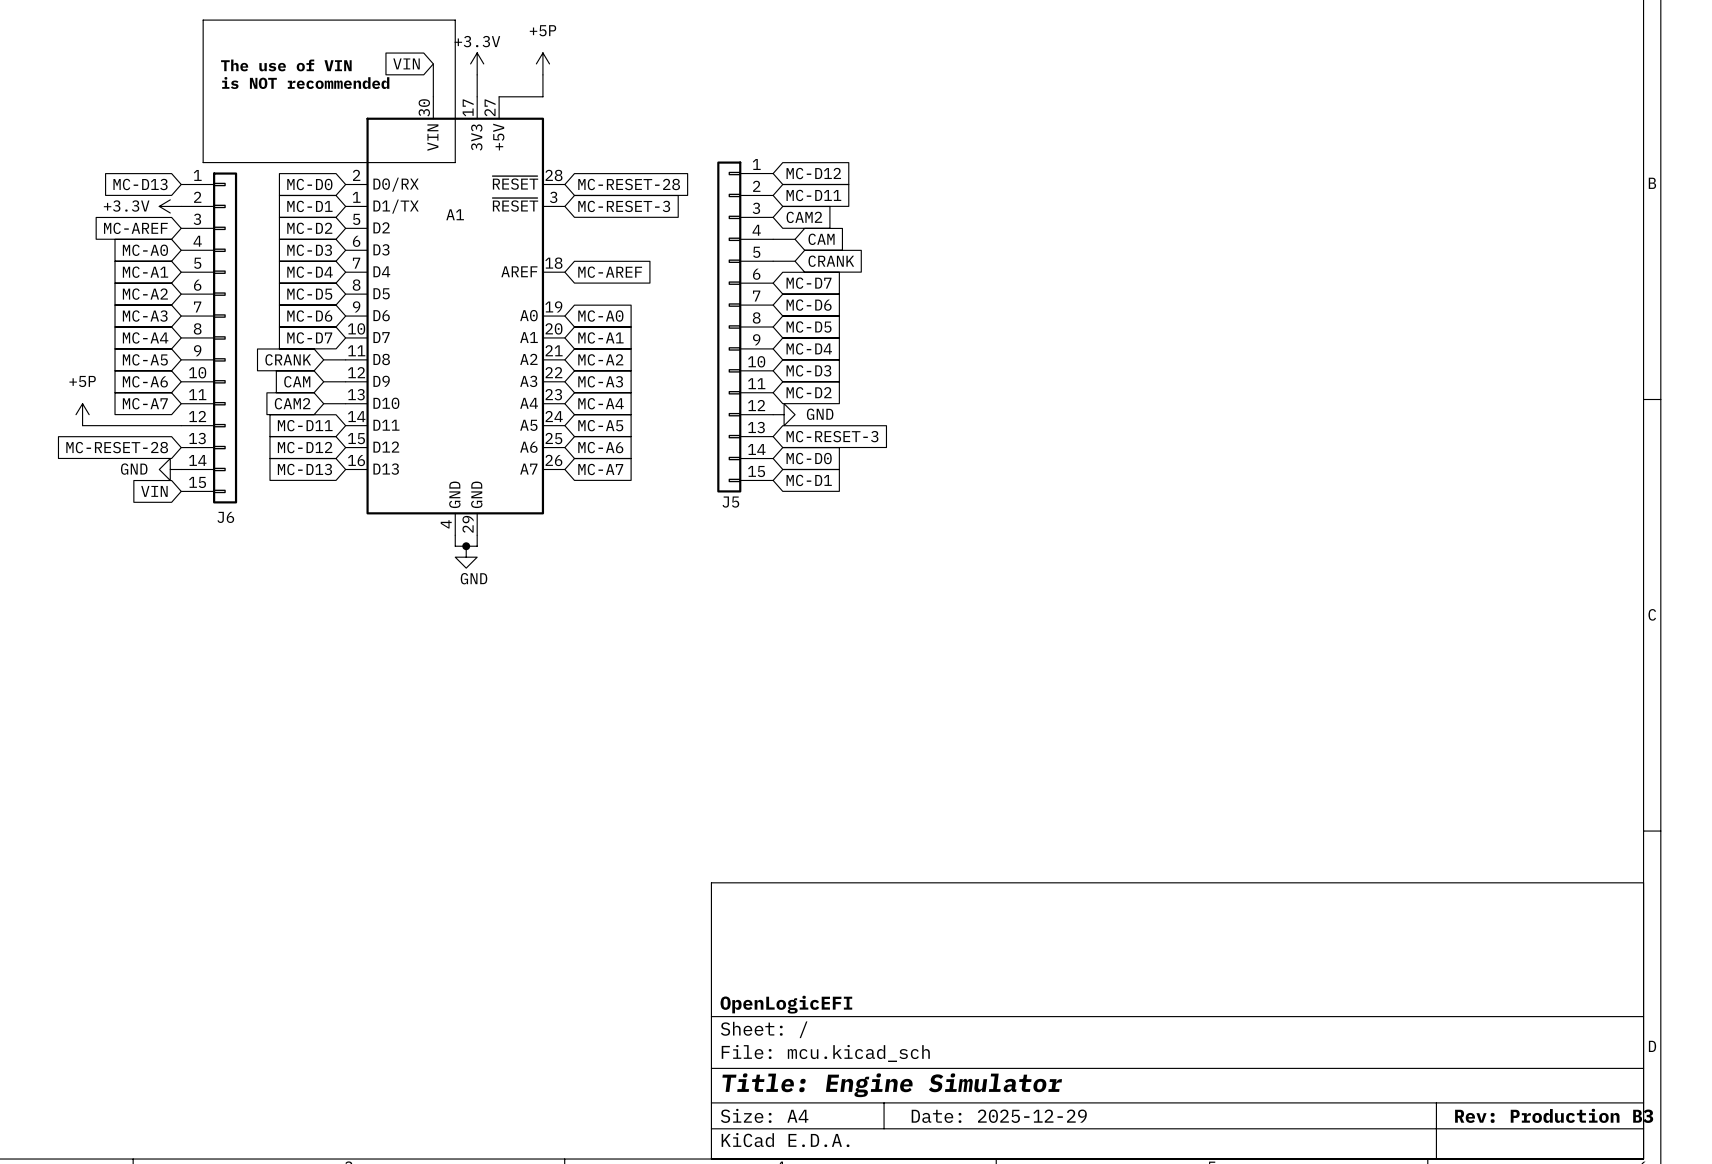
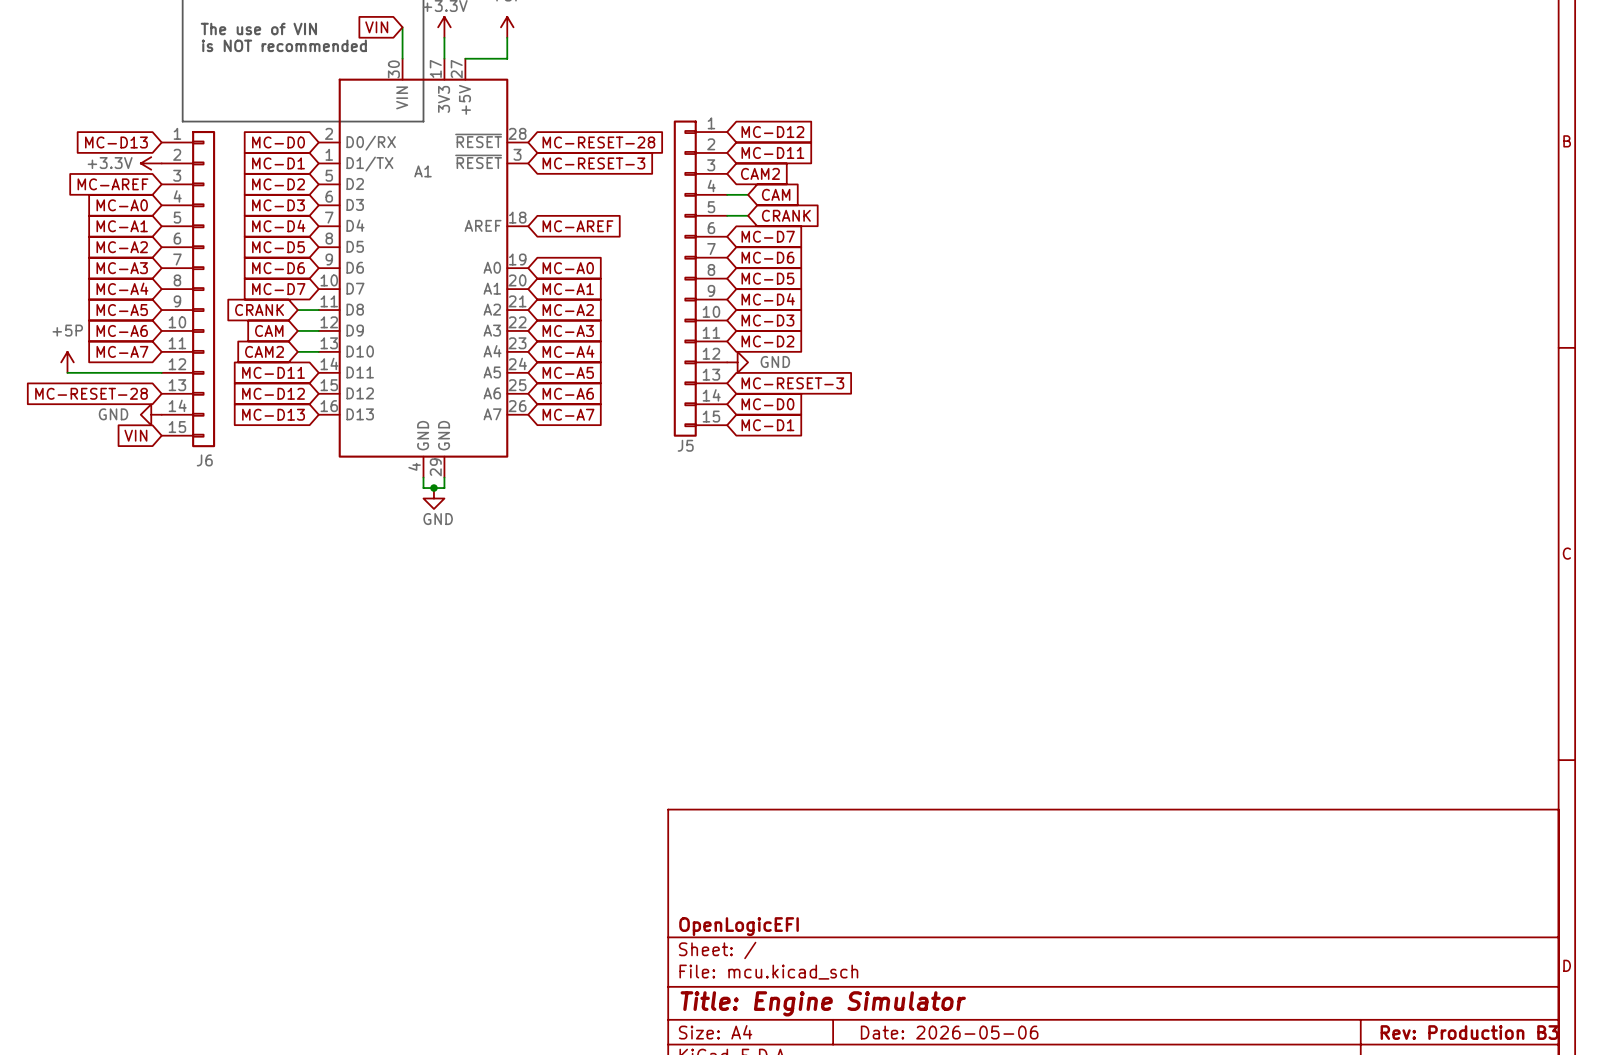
title block: Date: 2025-12-29 (999, 1116) -> Date: 2026-05-06 (949, 1032)

